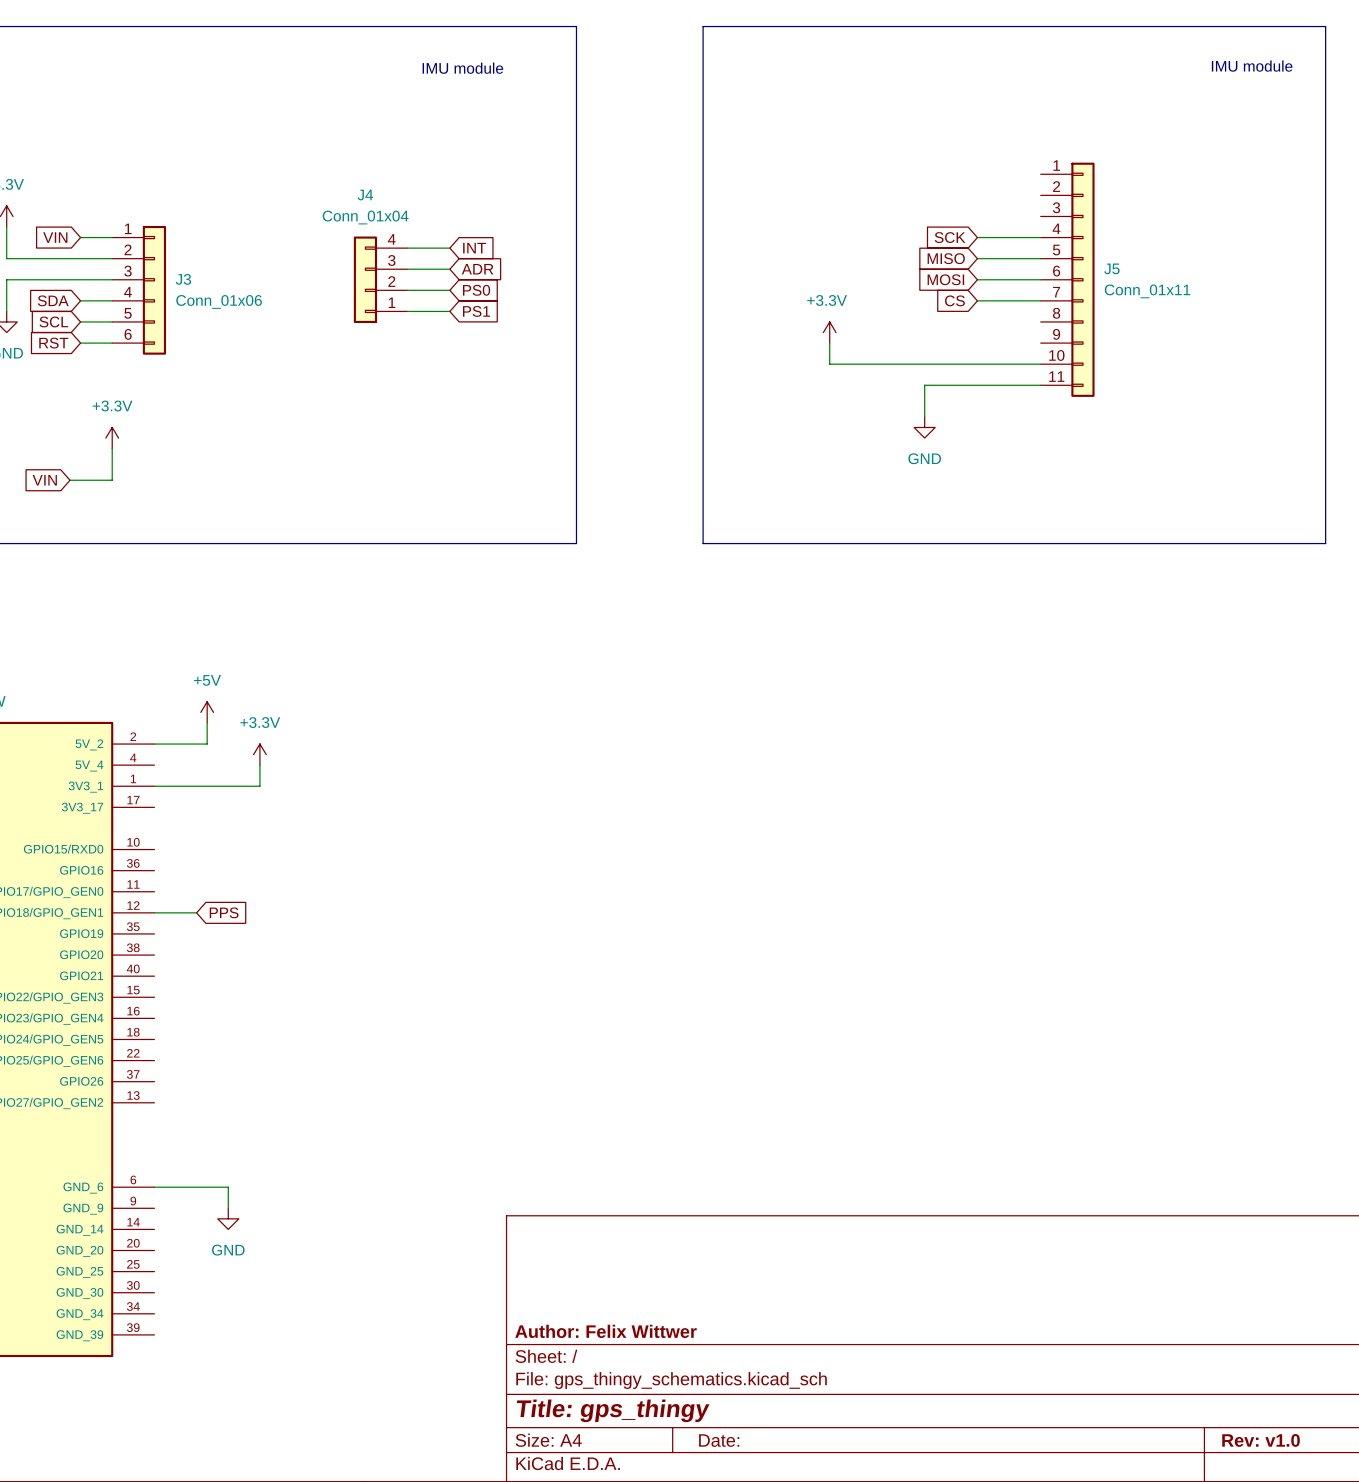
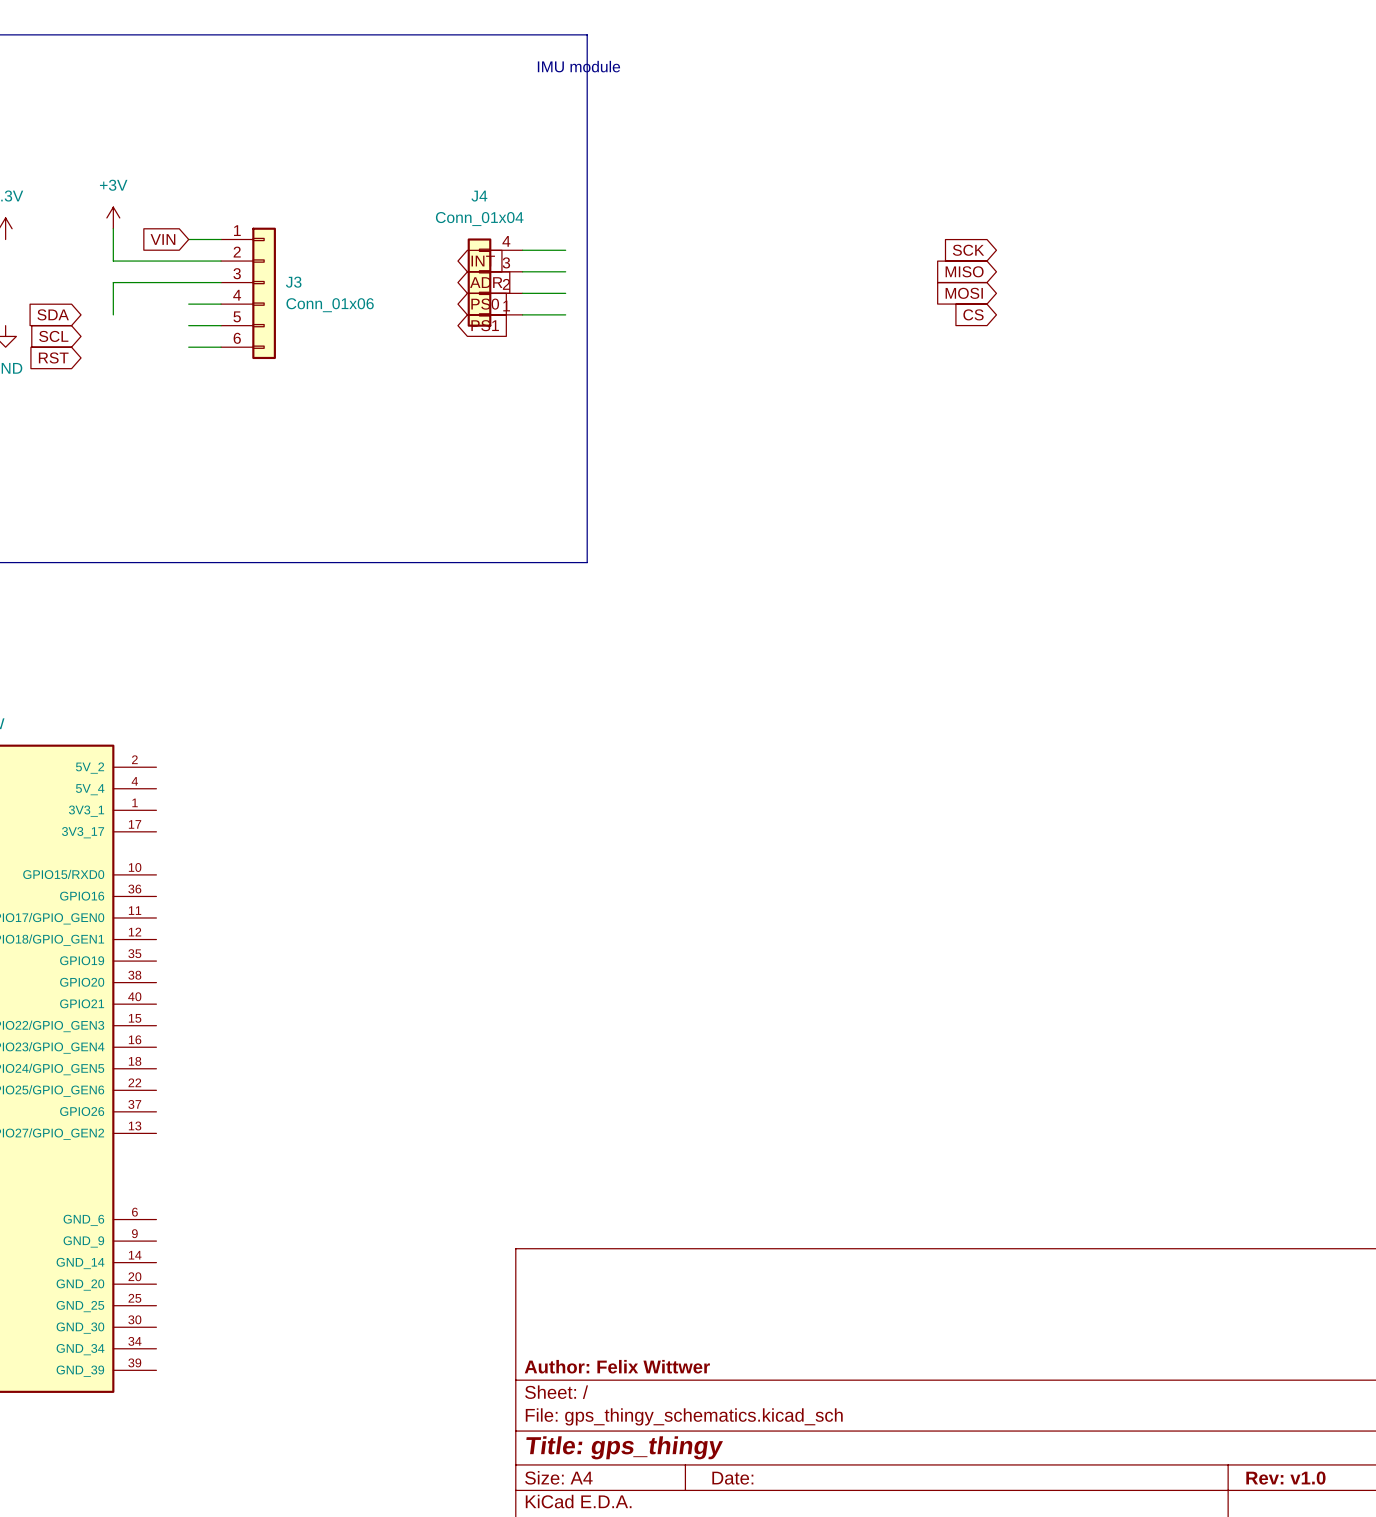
line: (703, 26) (1325, 26) (1325, 543) (703, 543) (703, 26) -> none
text: IMU module (1252, 66) -> none
text position: IMU module (462, 68) -> IMU module (578, 66)
power symbol: none -> +3V (113, 217)
wire: (6, 227) (6, 258) (112, 258) -> (113, 228) (113, 261) (221, 261)
global label position: VIN (55, 237) -> VIN (162, 239)
wire: (80, 237) (112, 237) -> (188, 239) (221, 239)
wire: (977, 237) (1040, 237) -> none
wire: (407, 248) (449, 248) -> (522, 250) (565, 250)
wire: (977, 258) (1040, 258) -> none
wire: (407, 269) (449, 269) -> (522, 271) (565, 271)
wire: (112, 279) (6, 279) (6, 311) -> none
J4 position: (380, 279) -> (495, 282)
wire: (977, 279) (1040, 279) -> none
J5: Conn_01x11 (1067, 279) -> none
J3 position: (139, 290) -> (248, 293)
wire: none -> (188, 304) (221, 304)
wire: (407, 290) (449, 290) -> (522, 293) (565, 293)
wire: (80, 300) (112, 300) -> (221, 282) (113, 282) (113, 314)
wire: (977, 300) (1040, 300) -> none
wire: (407, 311) (449, 311) -> (522, 314) (565, 314)
wire: (80, 321) (112, 321) -> (188, 325) (221, 325)
power symbol: +3.3V (829, 332) -> none
wire: (80, 343) (112, 343) -> (188, 347) (221, 347)
wire: (829, 343) (829, 364) (1040, 364) -> none
wire: (1040, 385) (924, 385) (924, 416) -> none
power symbol: GND (924, 427) -> none
power symbol: +3.3V (112, 438) -> none
wire: (112, 448) (112, 480) (70, 480) -> none
global label: VIN (44, 480) -> none
power symbol: +5V (207, 712) -> none
wire: (207, 722) (207, 744) (154, 744) -> none
power symbol: +3.3V (259, 754) -> none
wire: (259, 765) (259, 786) (154, 786) -> none
wire: (154, 912) (196, 912) -> none
global label: PPS (224, 912) -> none
wire: (154, 1187) (228, 1187) (228, 1208) -> none
power symbol: GND (228, 1218) -> none

